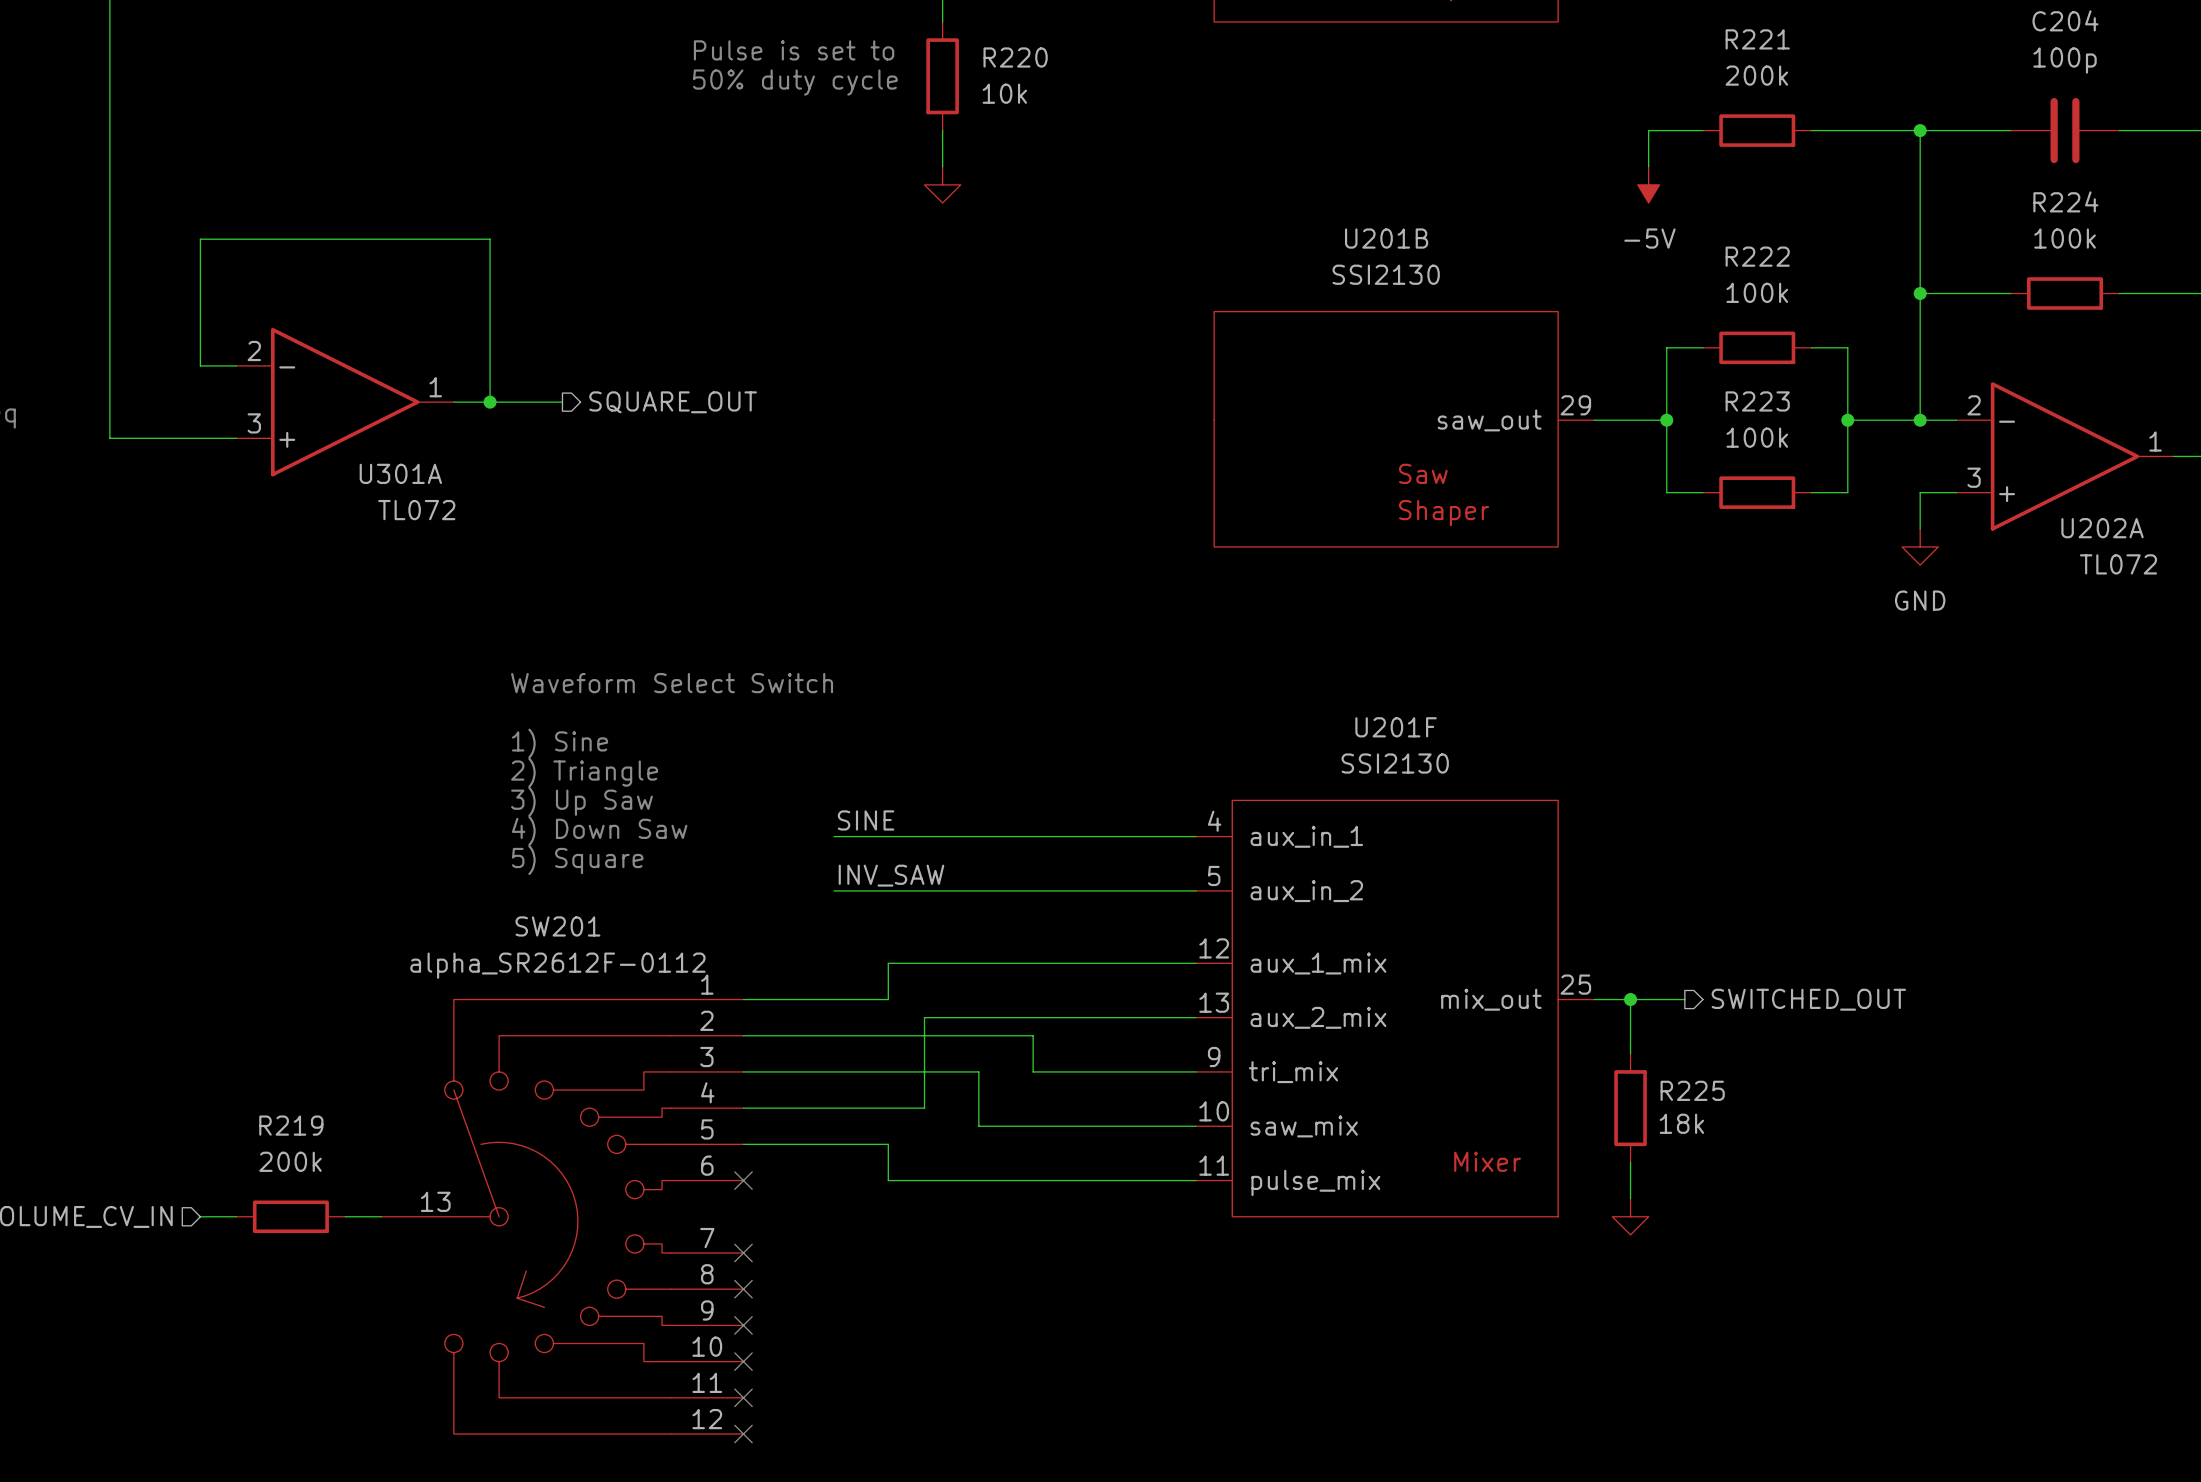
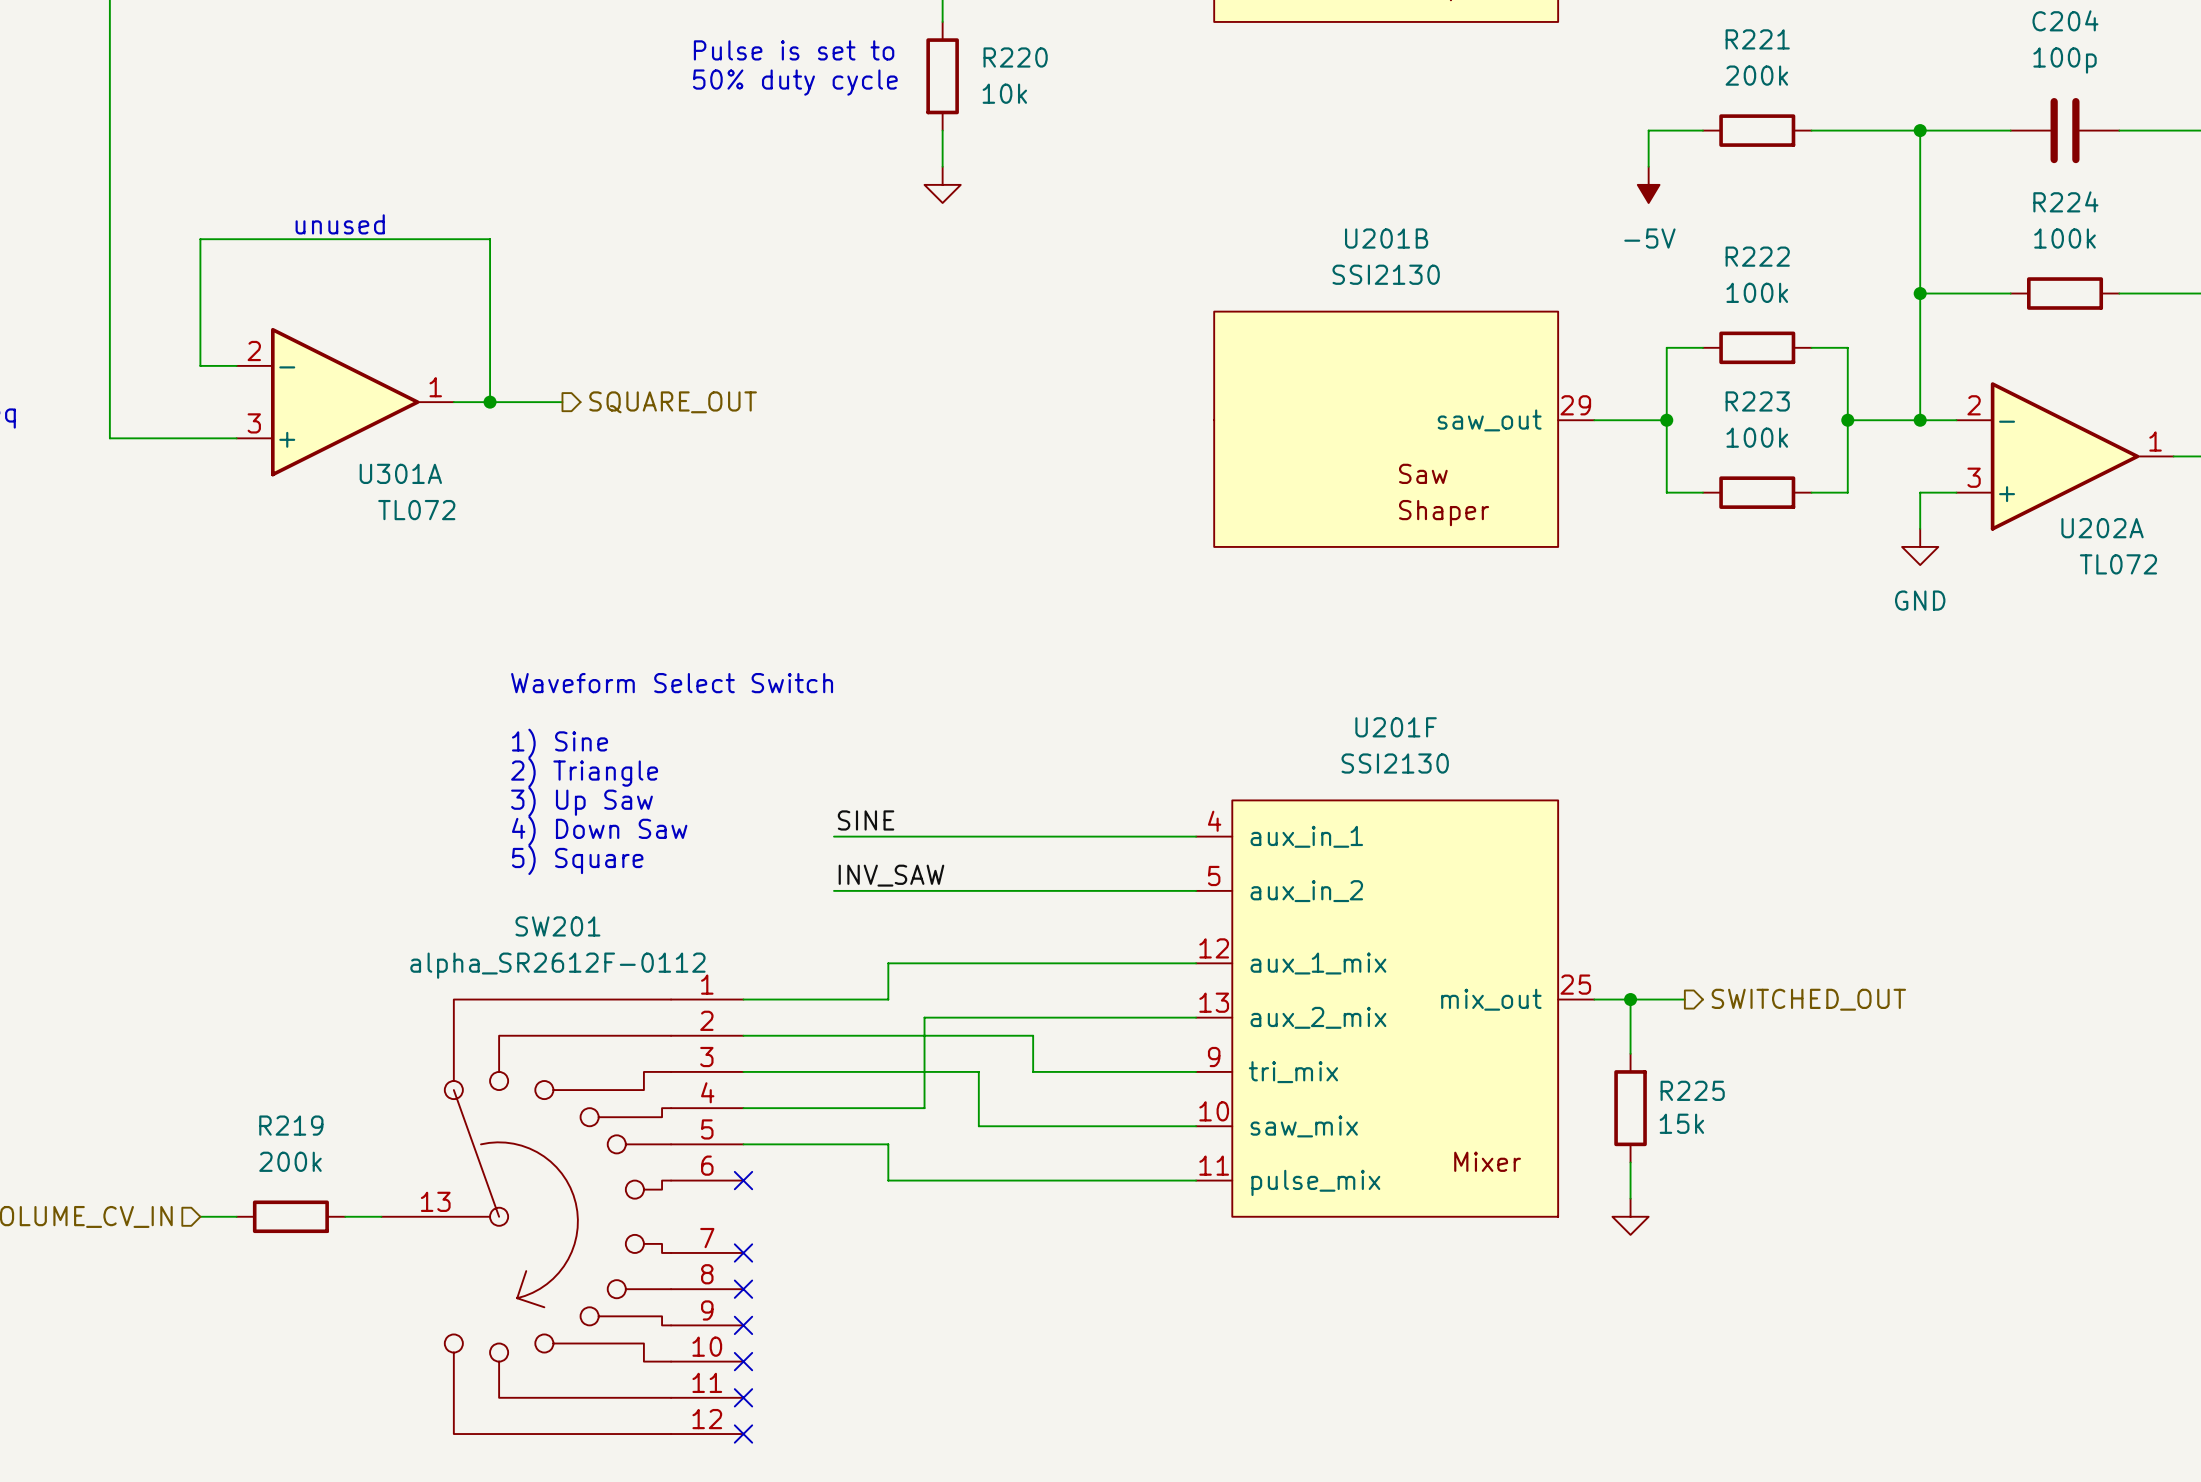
text: none -> unused (340, 224)
R225 value: 18k (1681, 1123) -> 15k (1681, 1123)

